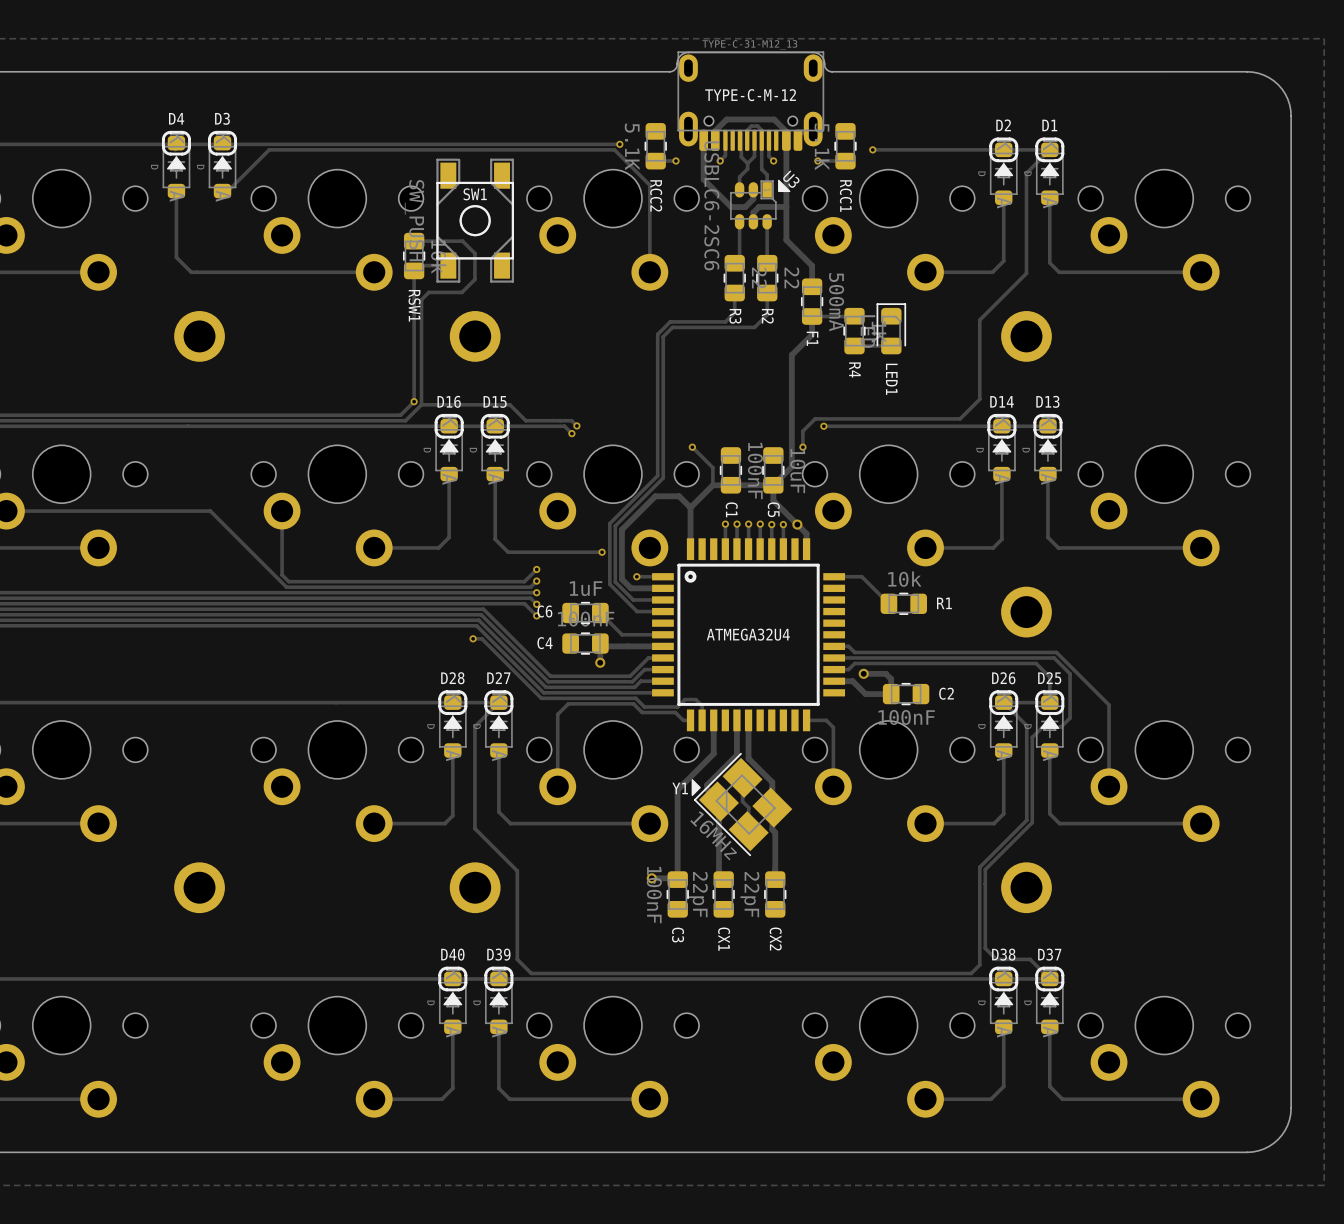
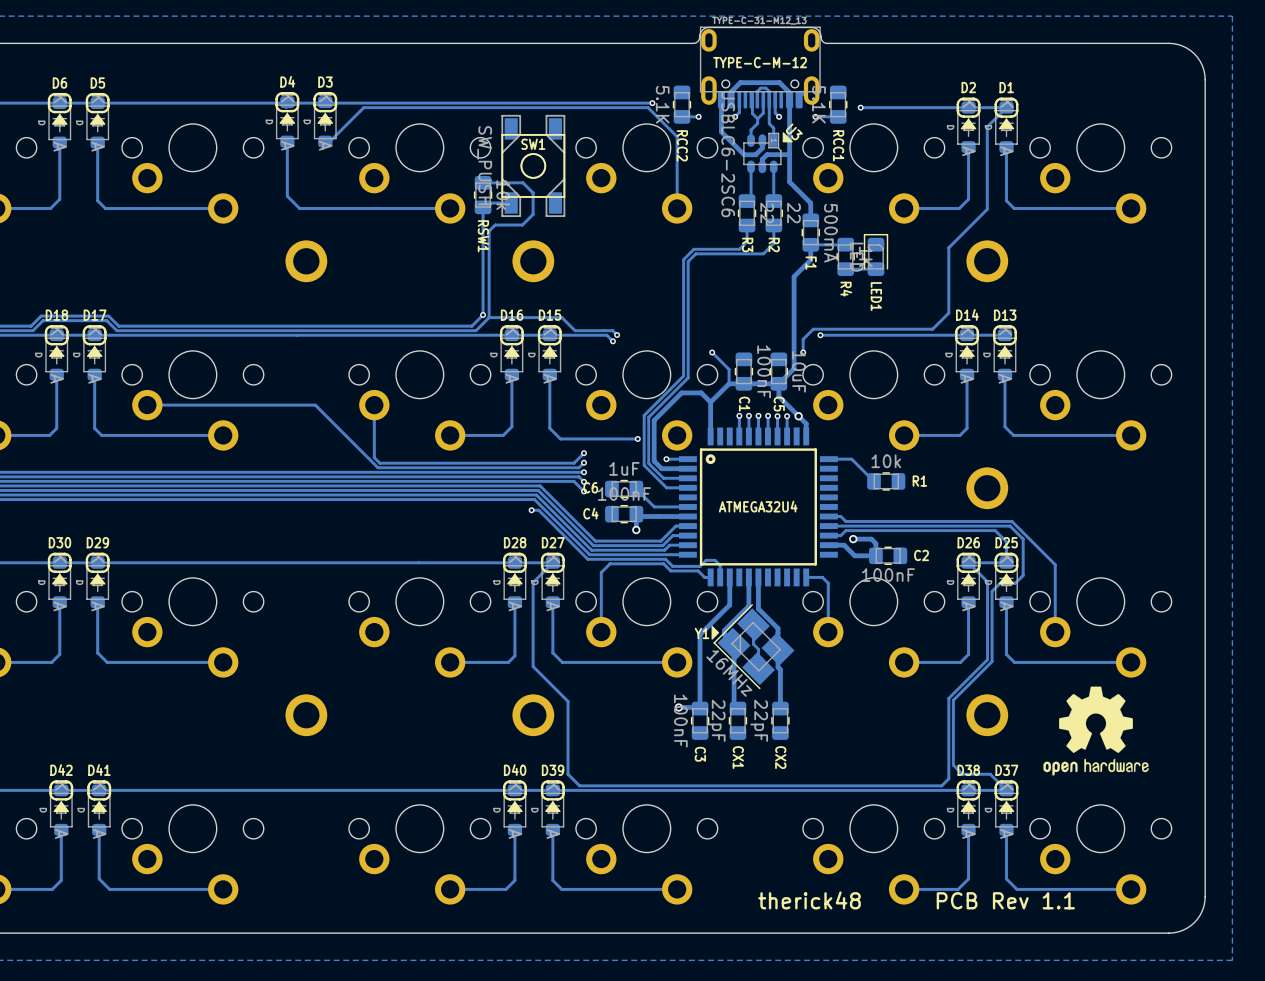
drawing: none -> [1043, 686, 1149, 776]
text: none -> therick48 (809, 900)
text: none -> PCB Rev 1.1 (1005, 900)

